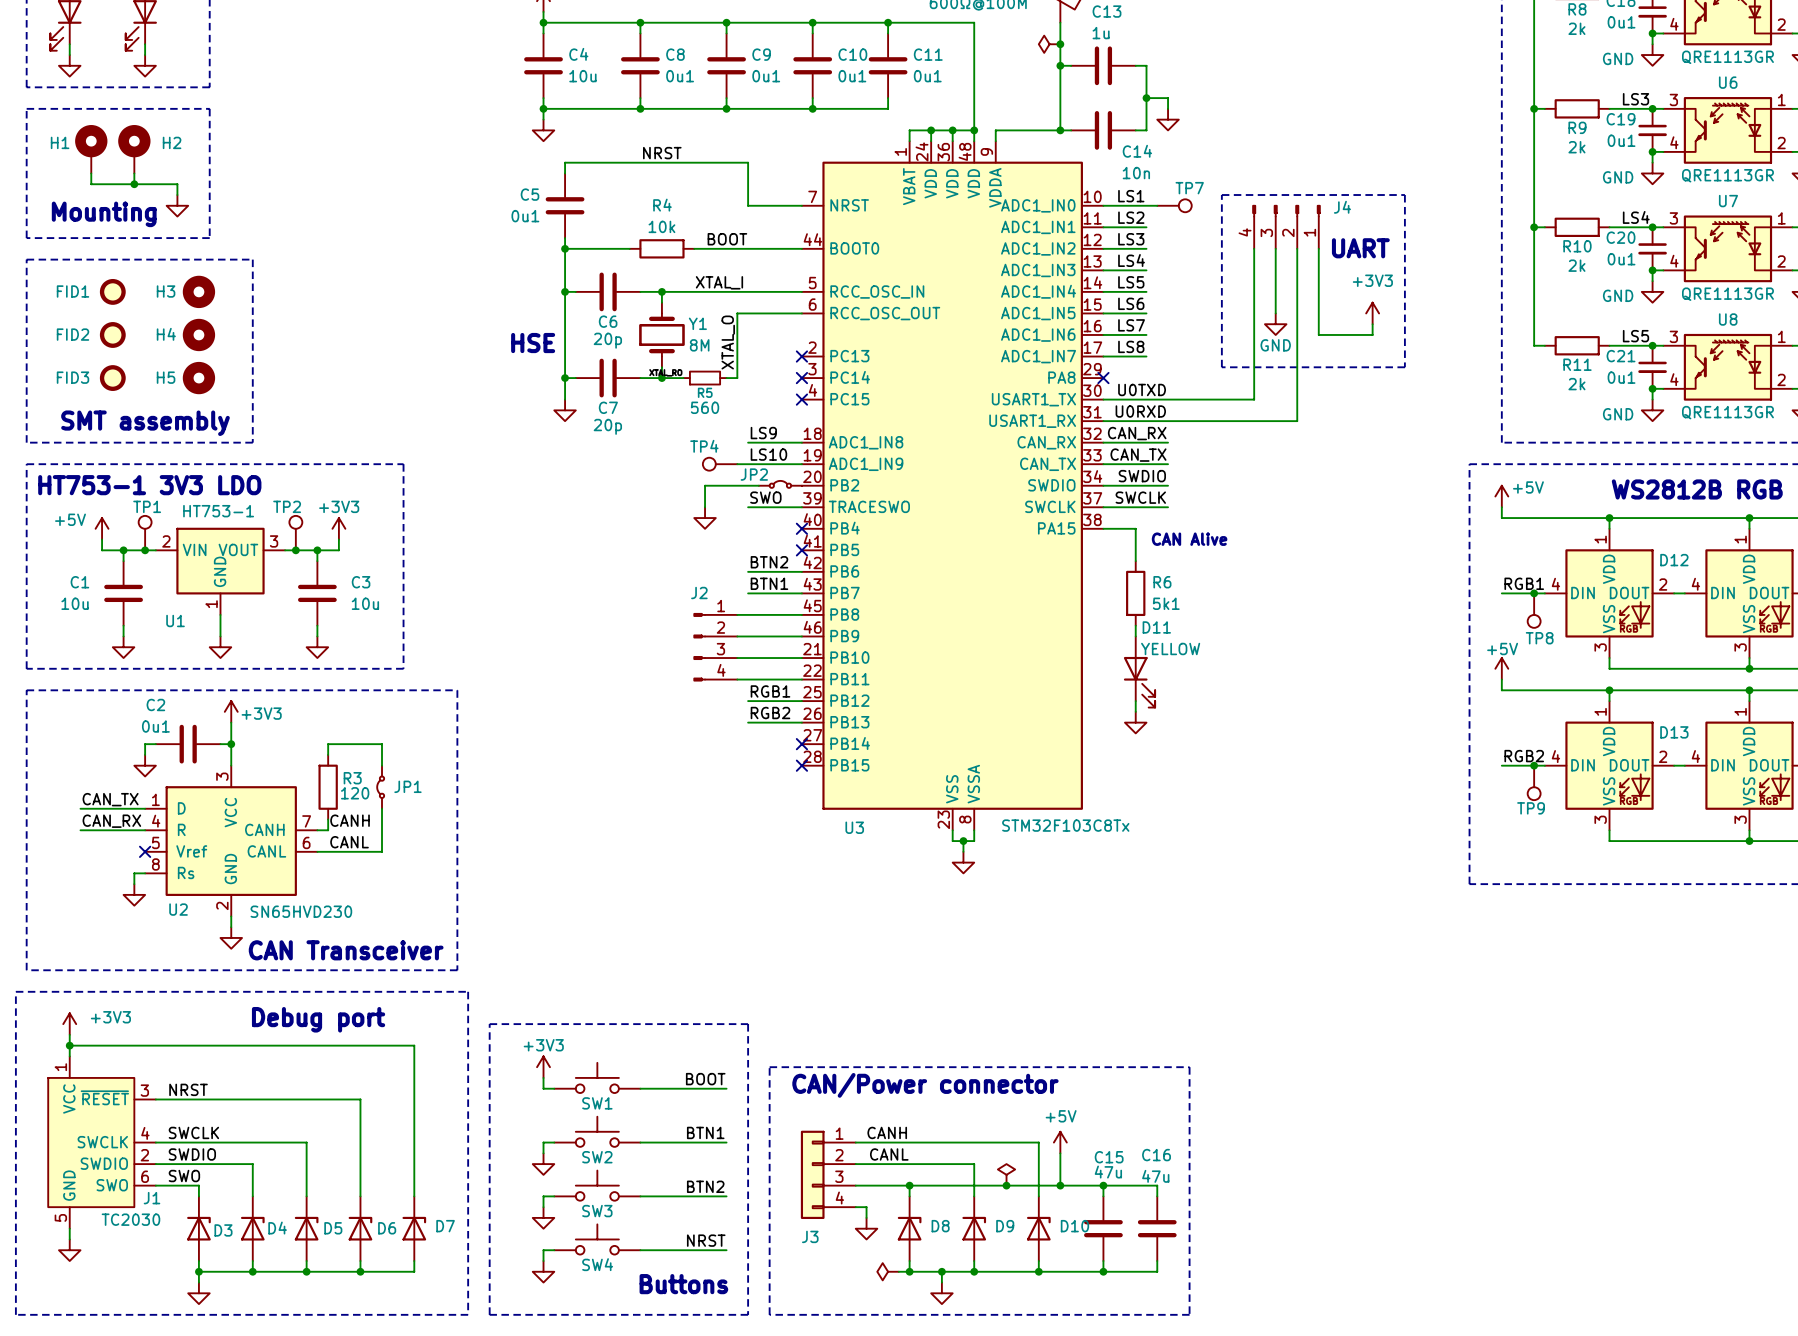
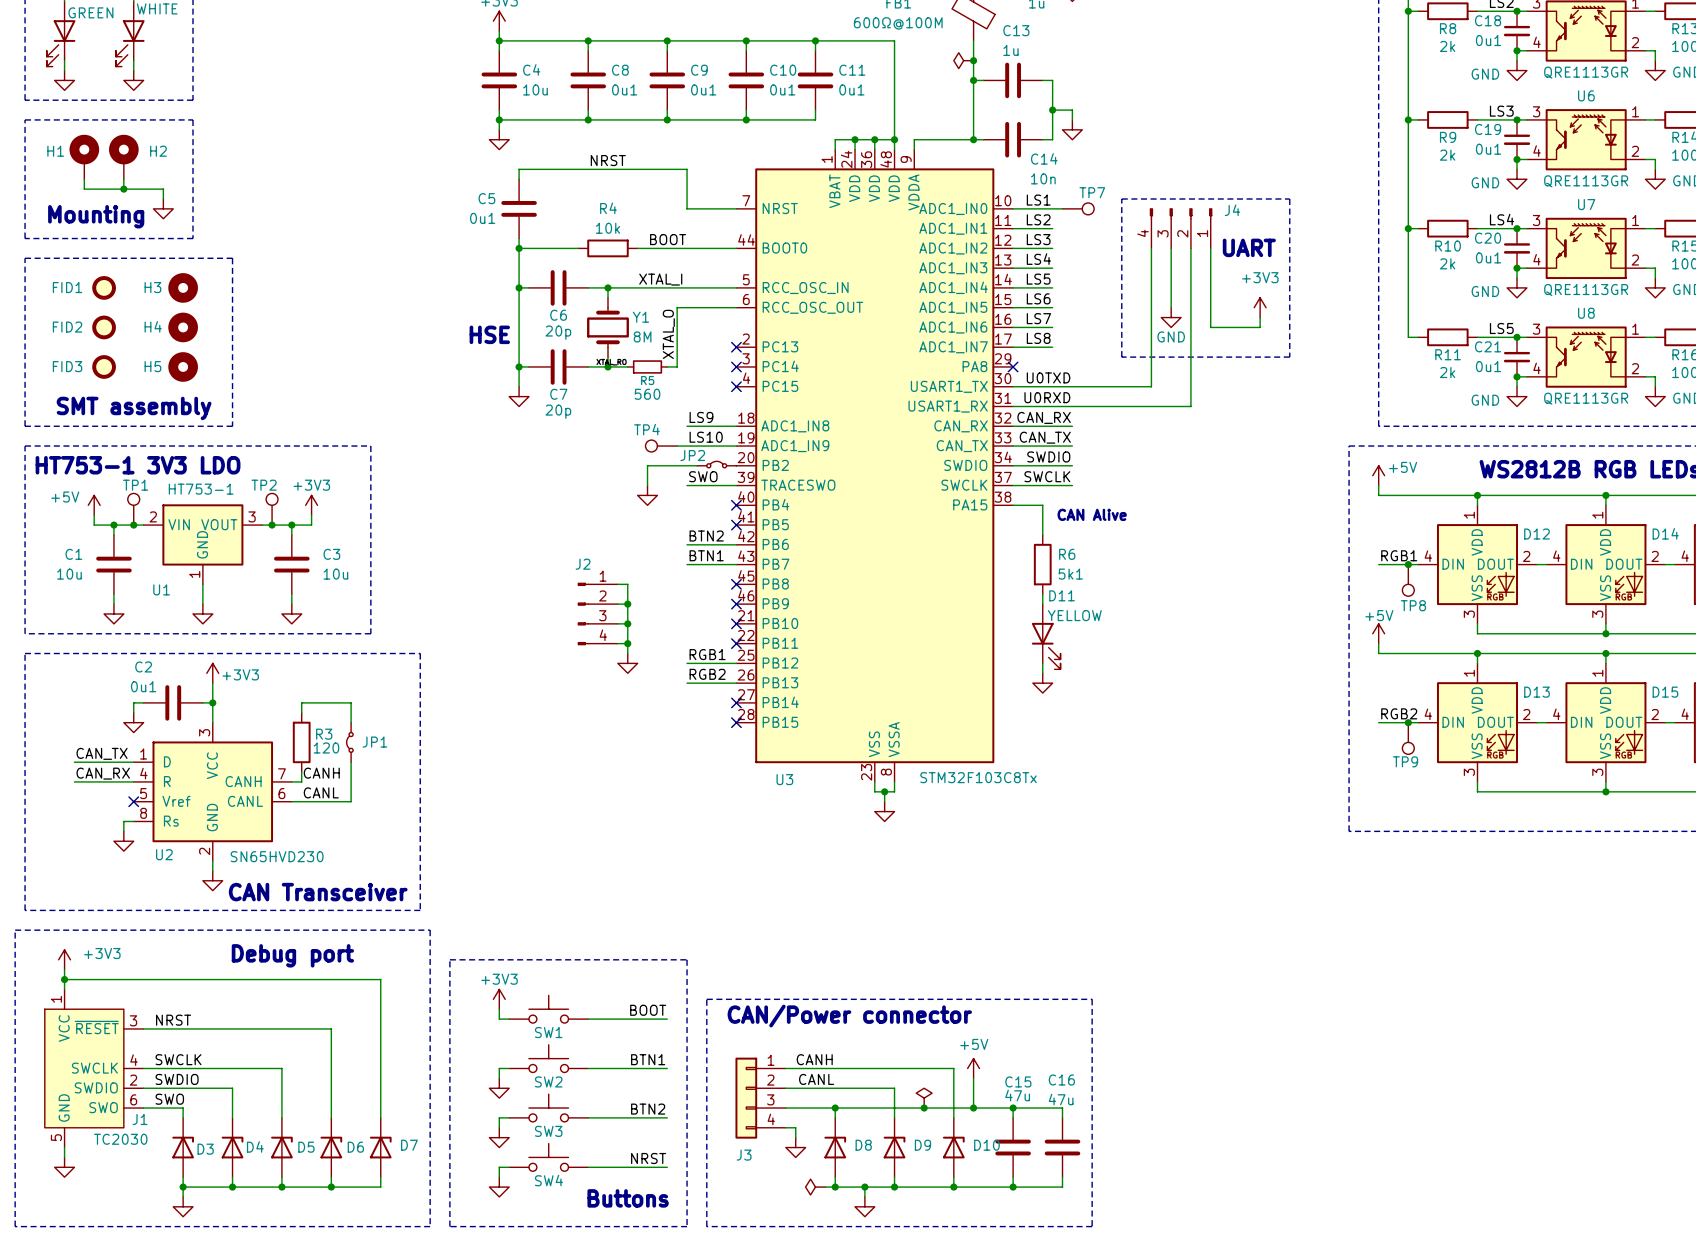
wire: none -> (617, 584) (627, 584) (627, 653)
wire: (737, 614) (801, 614) -> none
no-connect mark: none -> (736, 584)
wire: none -> (617, 604) (627, 604)
junction: none -> (627, 604)
wire: (737, 636) (801, 636) -> none
no-connect mark: none -> (736, 604)
J2 position: (715, 647) -> (597, 613)
wire: none -> (617, 623) (627, 623)
junction: none -> (627, 623)
wire: (737, 658) (801, 658) -> none
no-connect mark: none -> (736, 623)
wire: none -> (617, 643) (627, 643)
junction: none -> (627, 643)
wire: (737, 679) (801, 679) -> none
no-connect mark: none -> (736, 643)
power symbol: none -> (627, 663)

